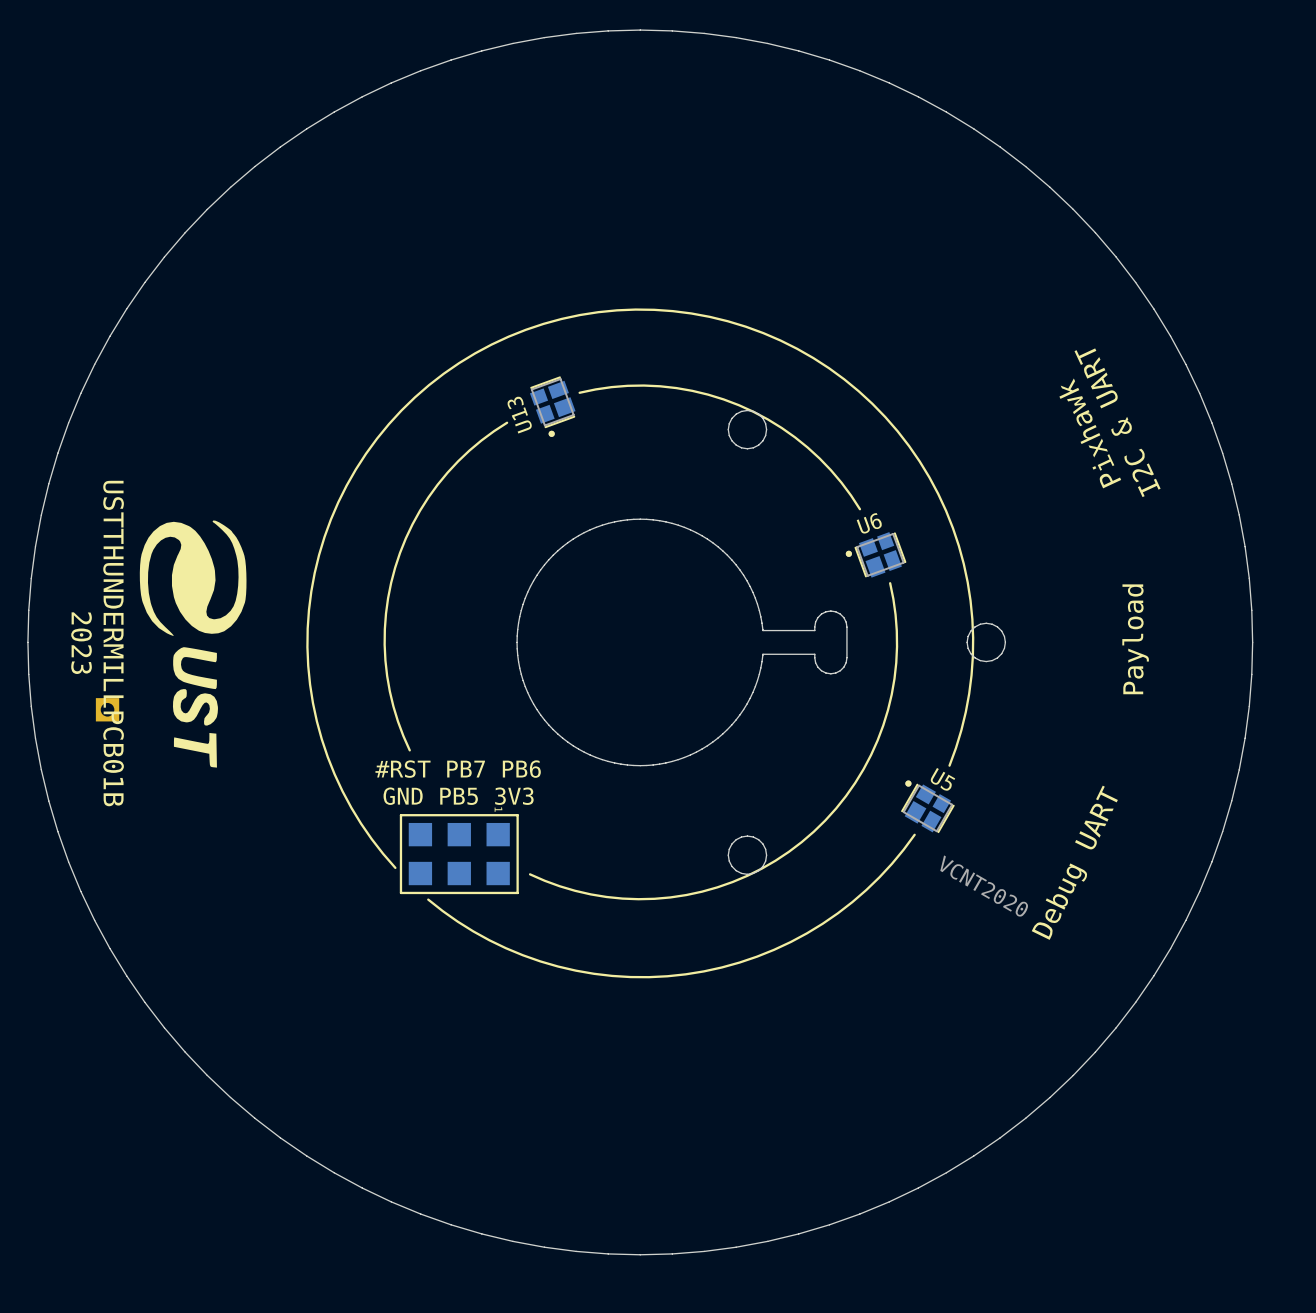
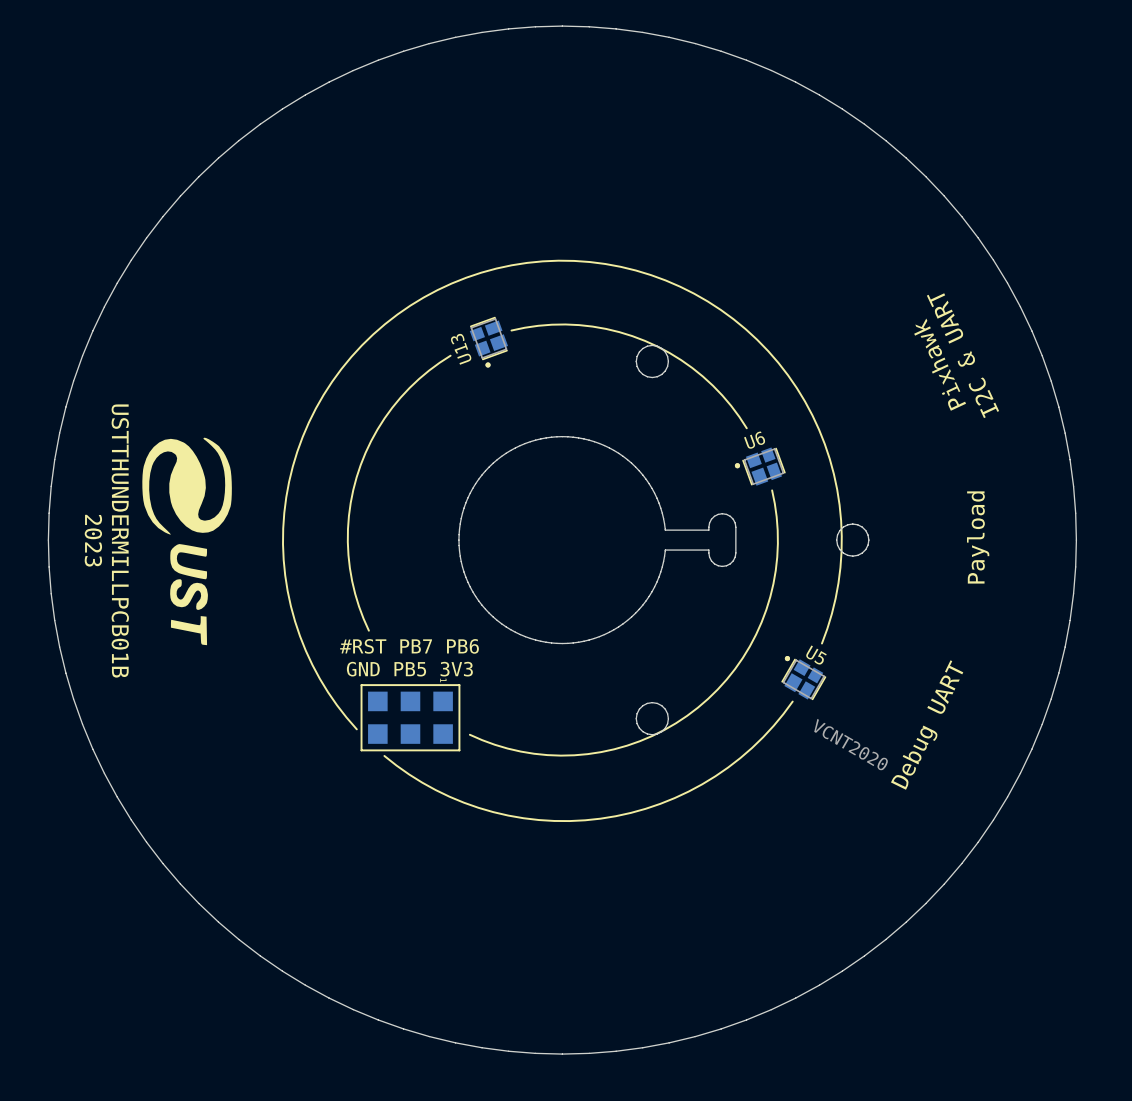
part: (107, 709) -> none

